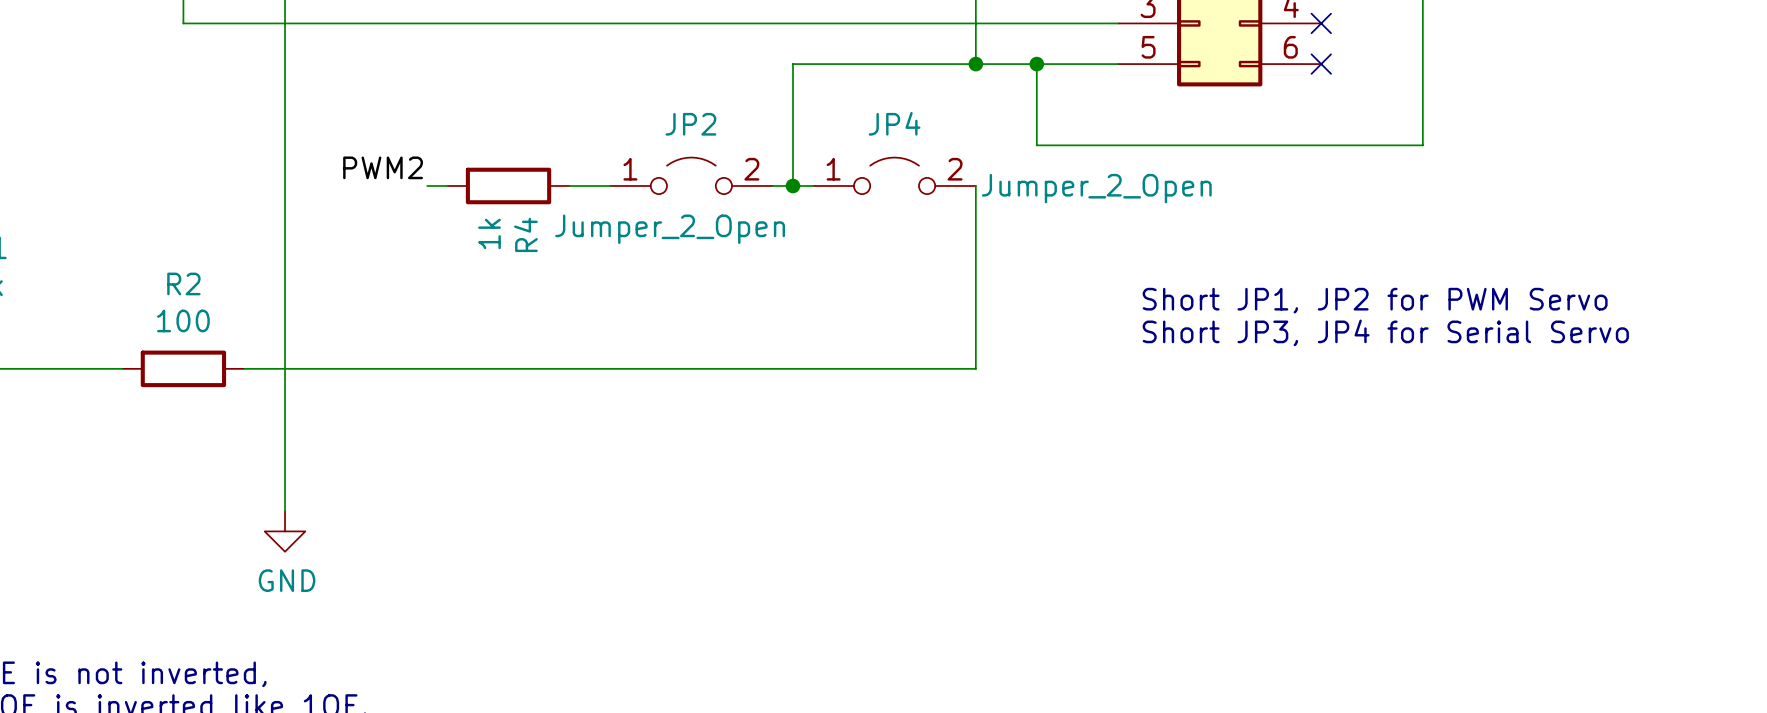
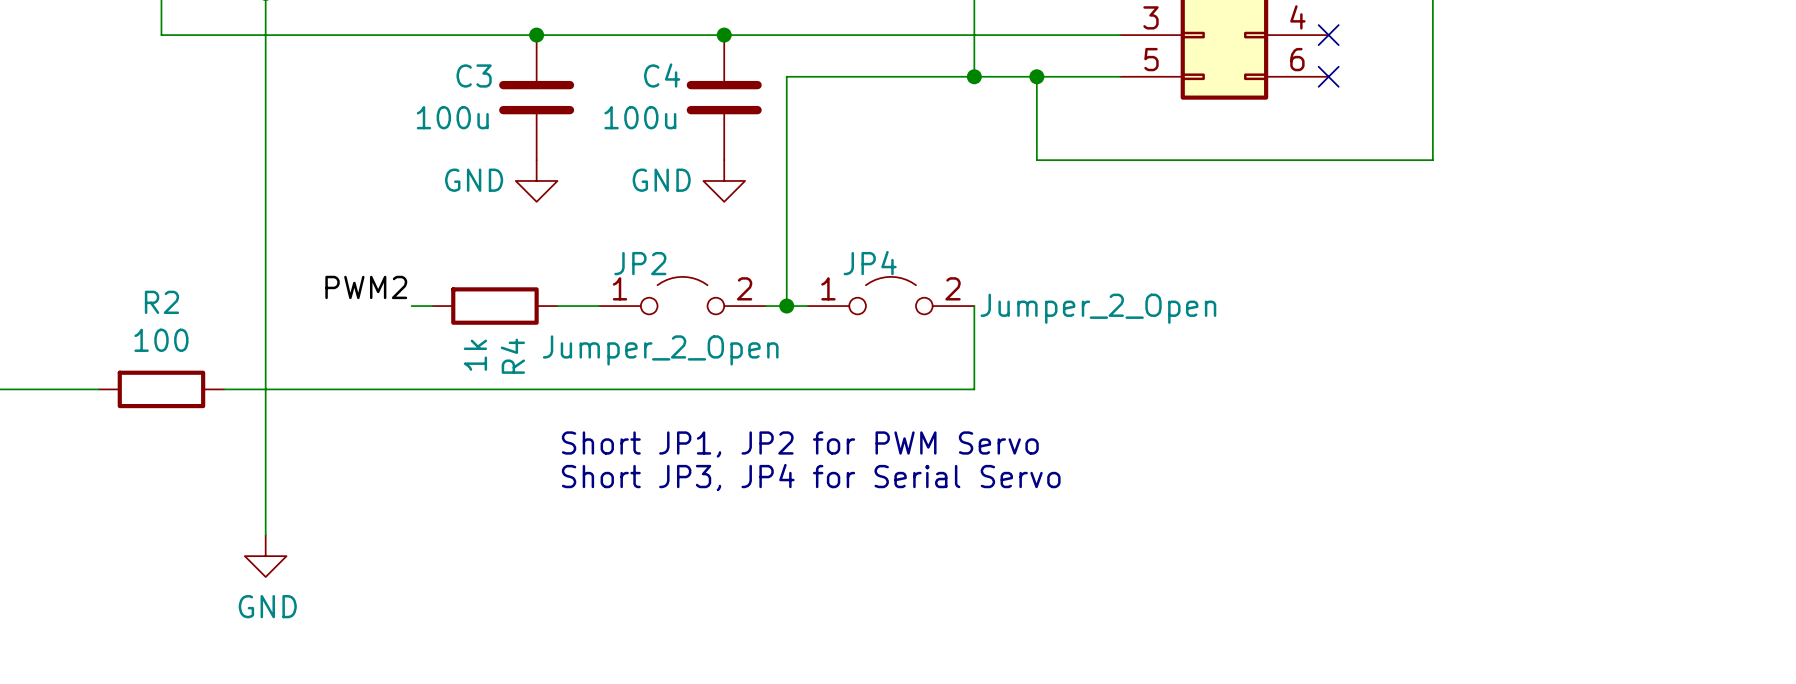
junction: none -> (536, 35)
junction: none -> (724, 35)
C3: none -> 100u (536, 97)
C4: none -> 100u (724, 97)
JP4 name position: JP4 (894, 123) -> JP4 (870, 263)
JP2 name position: JP2 (690, 124) -> JP2 (640, 263)
power symbol: none -> GND (536, 180)
power symbol: none -> GND (724, 180)
label position: PWM2 (383, 167) -> PWM2 (366, 287)
JP2 position: (691, 175) -> (682, 295)
JP4 position: (894, 175) -> (890, 295)
wire: (427, 185) (447, 185) -> (411, 306) (432, 306)
R4 position: (508, 185) -> (494, 306)
wire: (569, 185) (610, 185) -> (557, 306) (599, 306)
wire: (772, 185) (813, 185) -> (765, 306) (807, 306)
junction: (792, 185) -> none
wire: (975, 185) (975, 287) -> (786, 201) (786, 306)
junction: none -> (786, 306)
text: Short JP1, JP2 for PWM Servo (1375, 300) -> none
text: Short JP3, JP4 for Serial Servo (1385, 332) -> none
text: none -> Short JP1, JP2 for PWM Servo (800, 444)
text: none -> Short JP3, JP4 for Serial Servo (811, 477)

